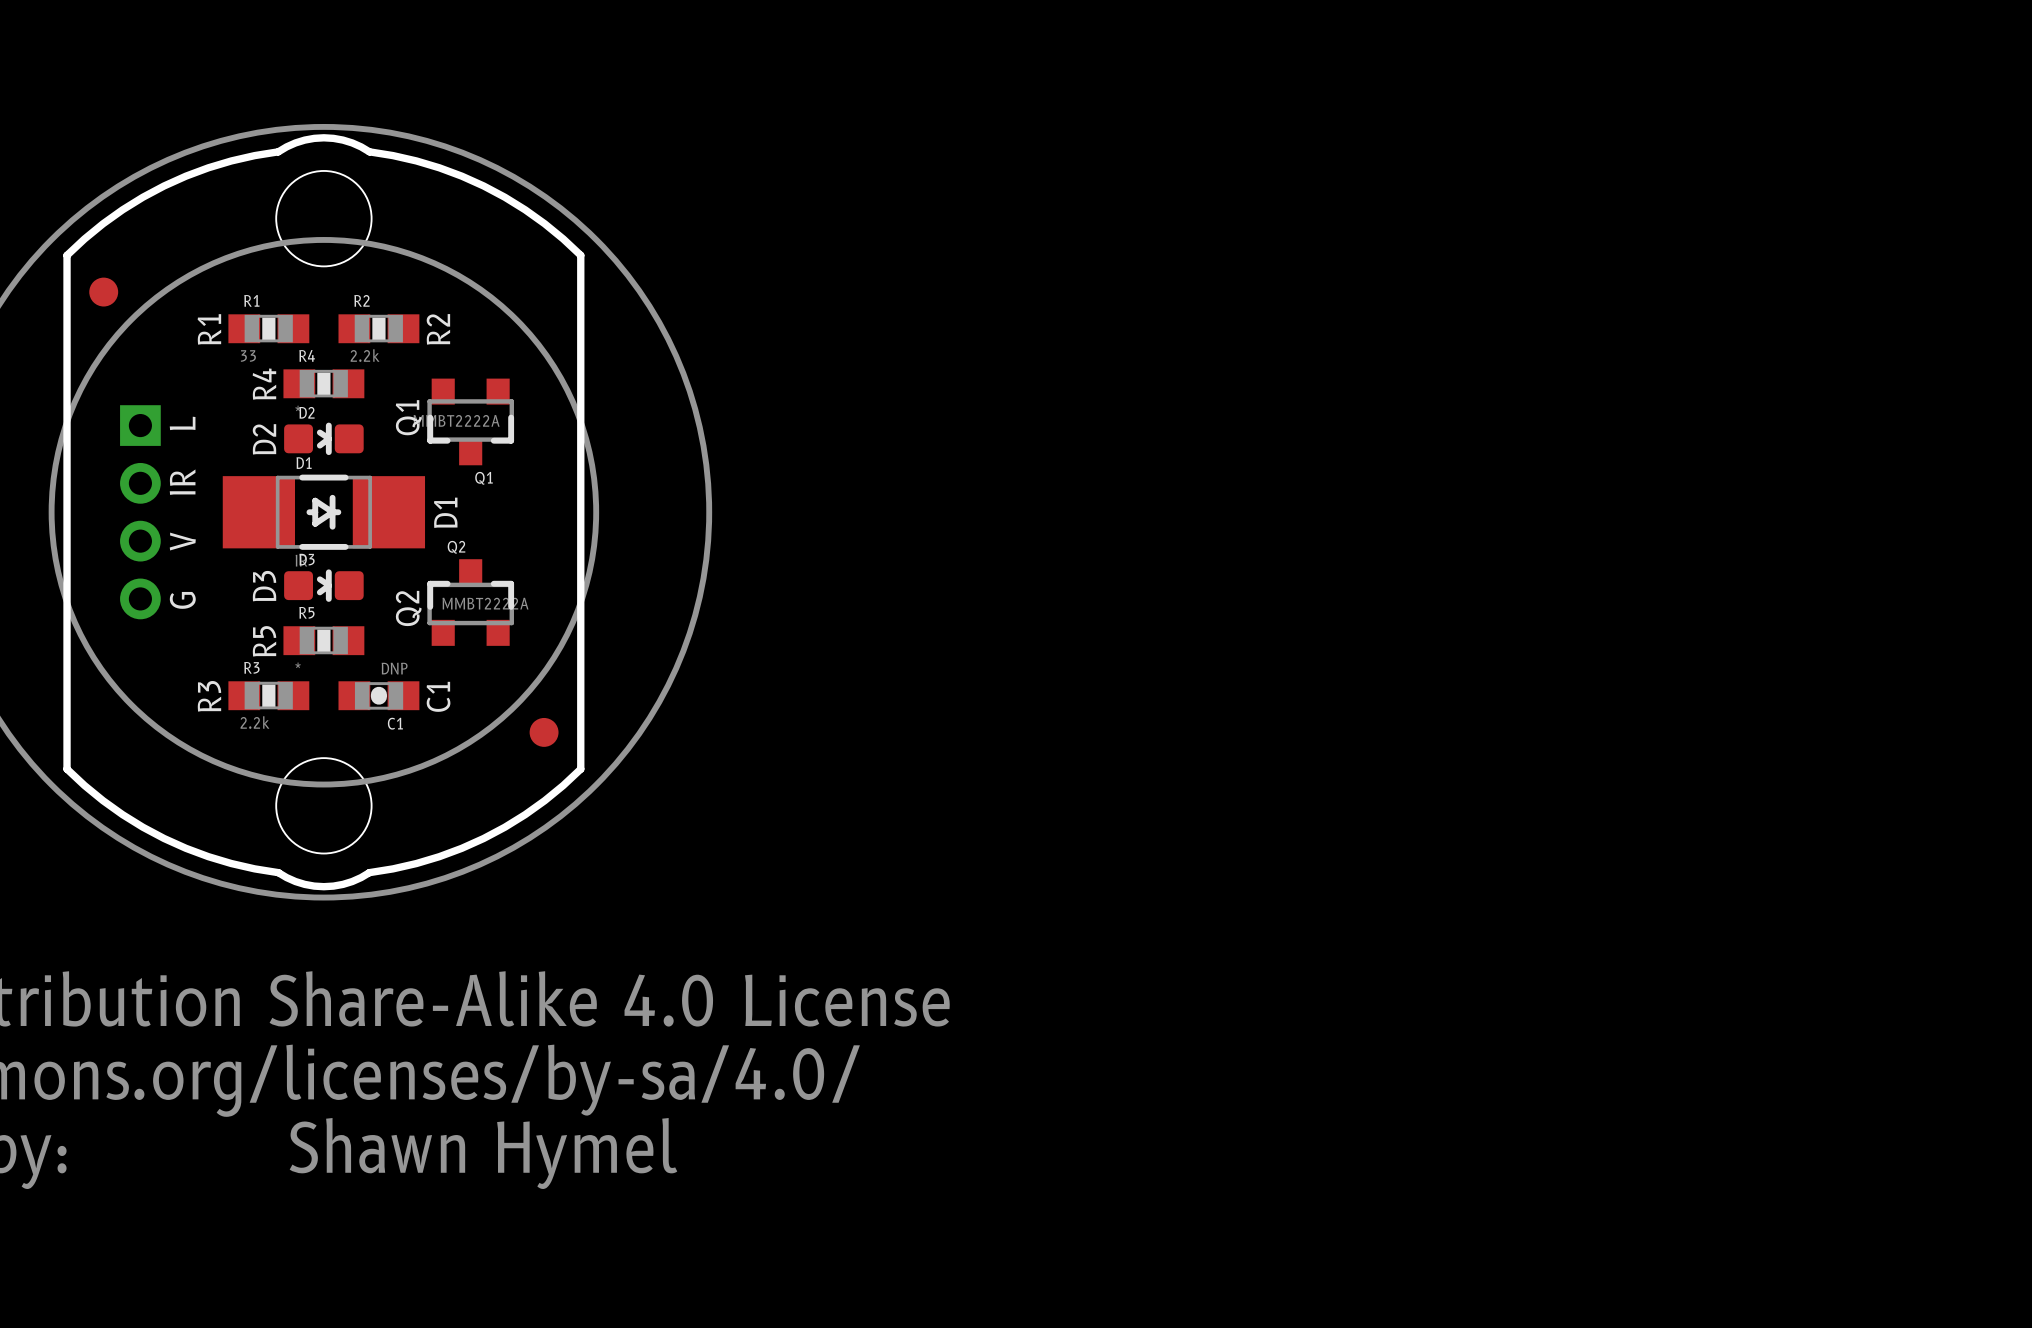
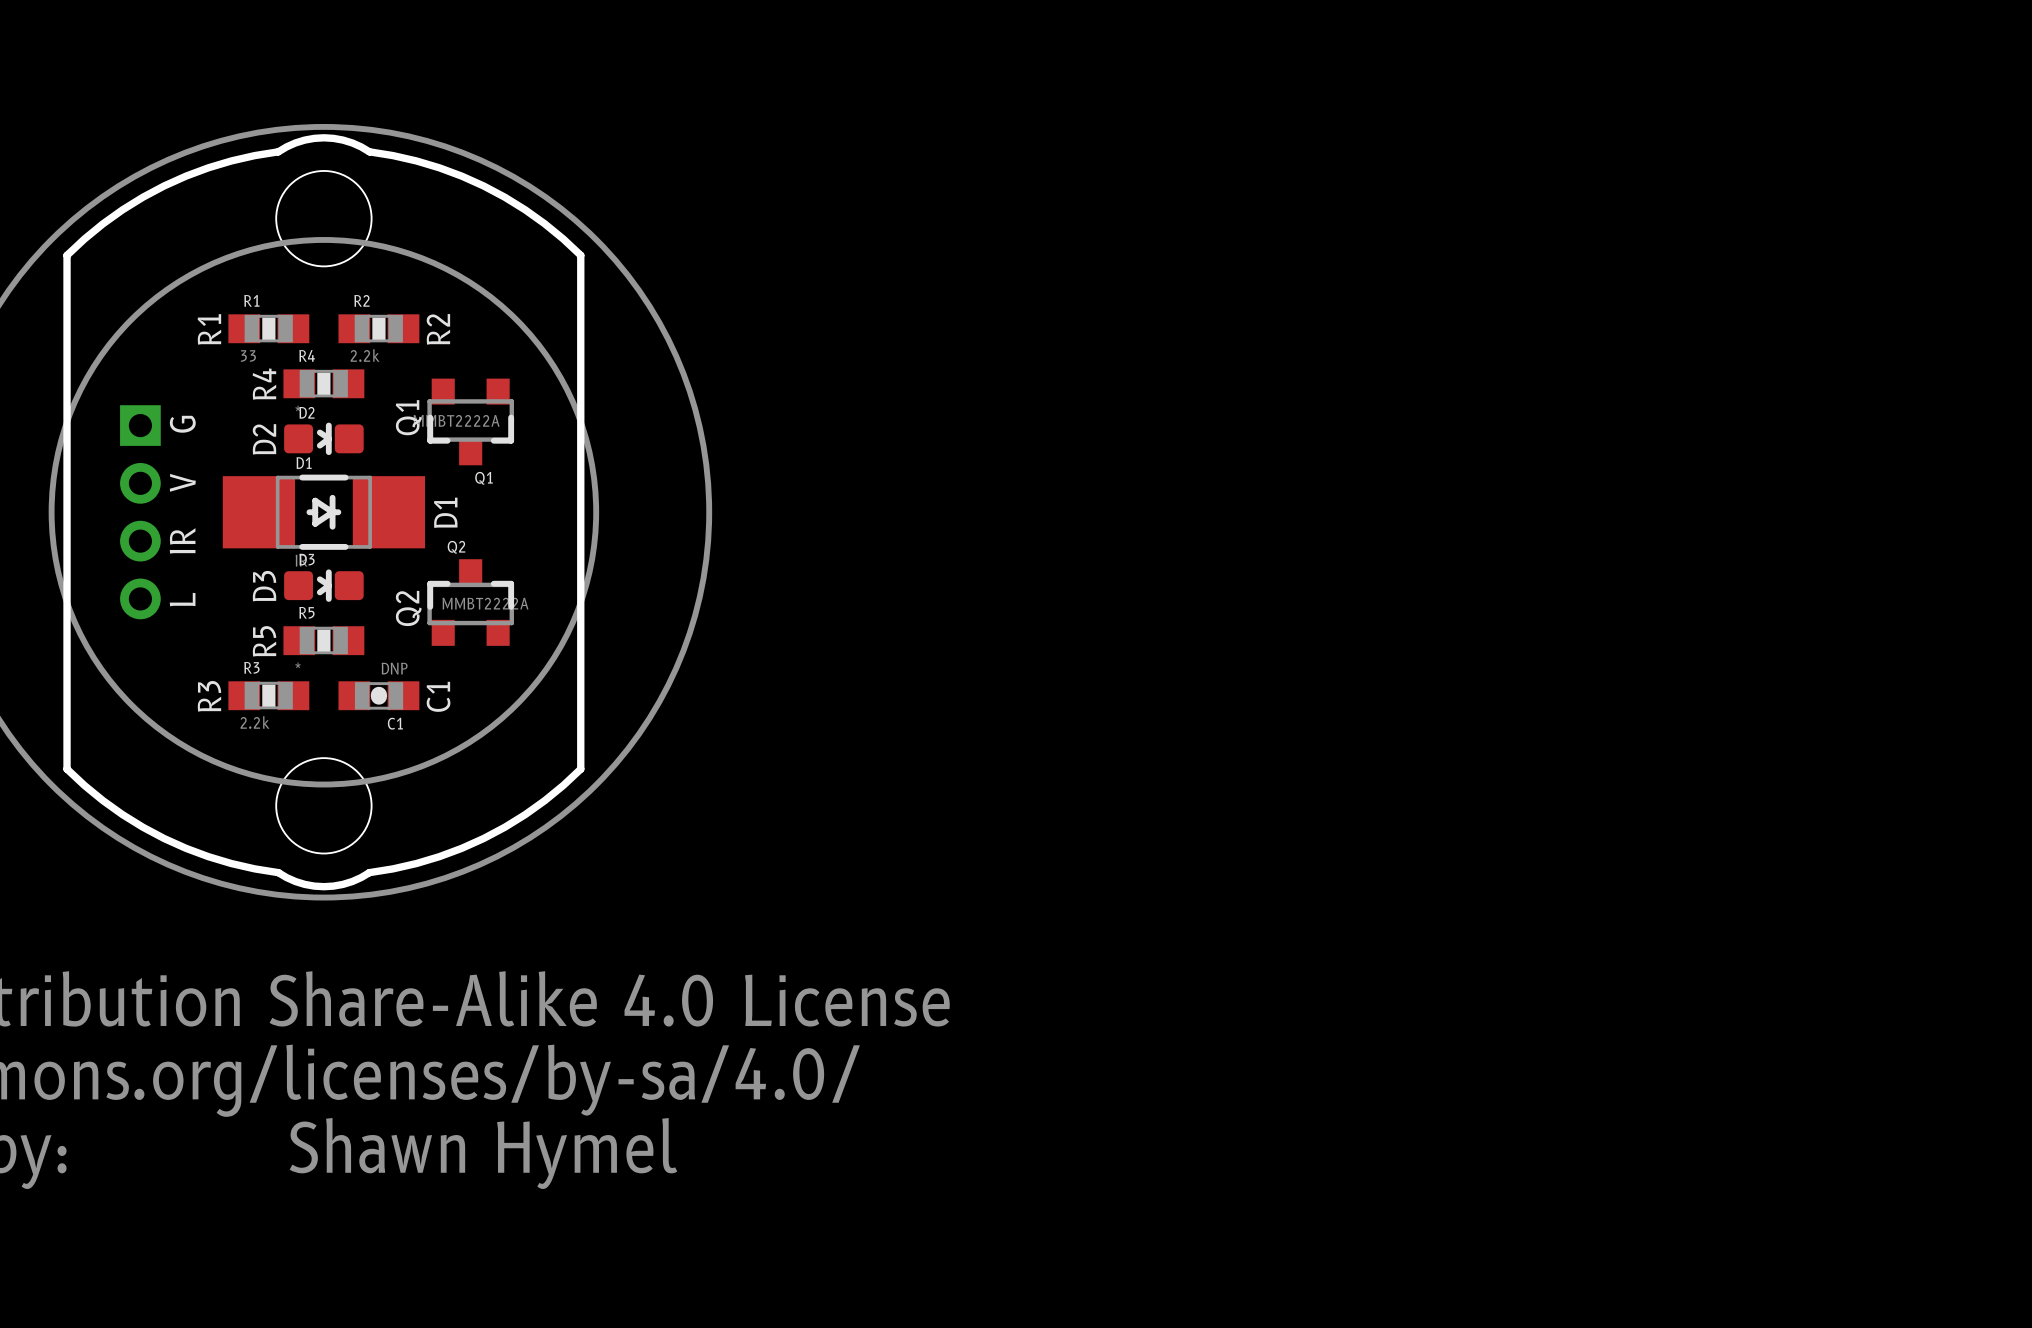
part: (103, 292) -> none
text: L (182, 423) -> G (182, 424)
text: IR (182, 482) -> V (182, 482)
text: V (182, 541) -> IR (182, 540)
text: G (182, 600) -> L (182, 599)
part: (544, 732) -> none

